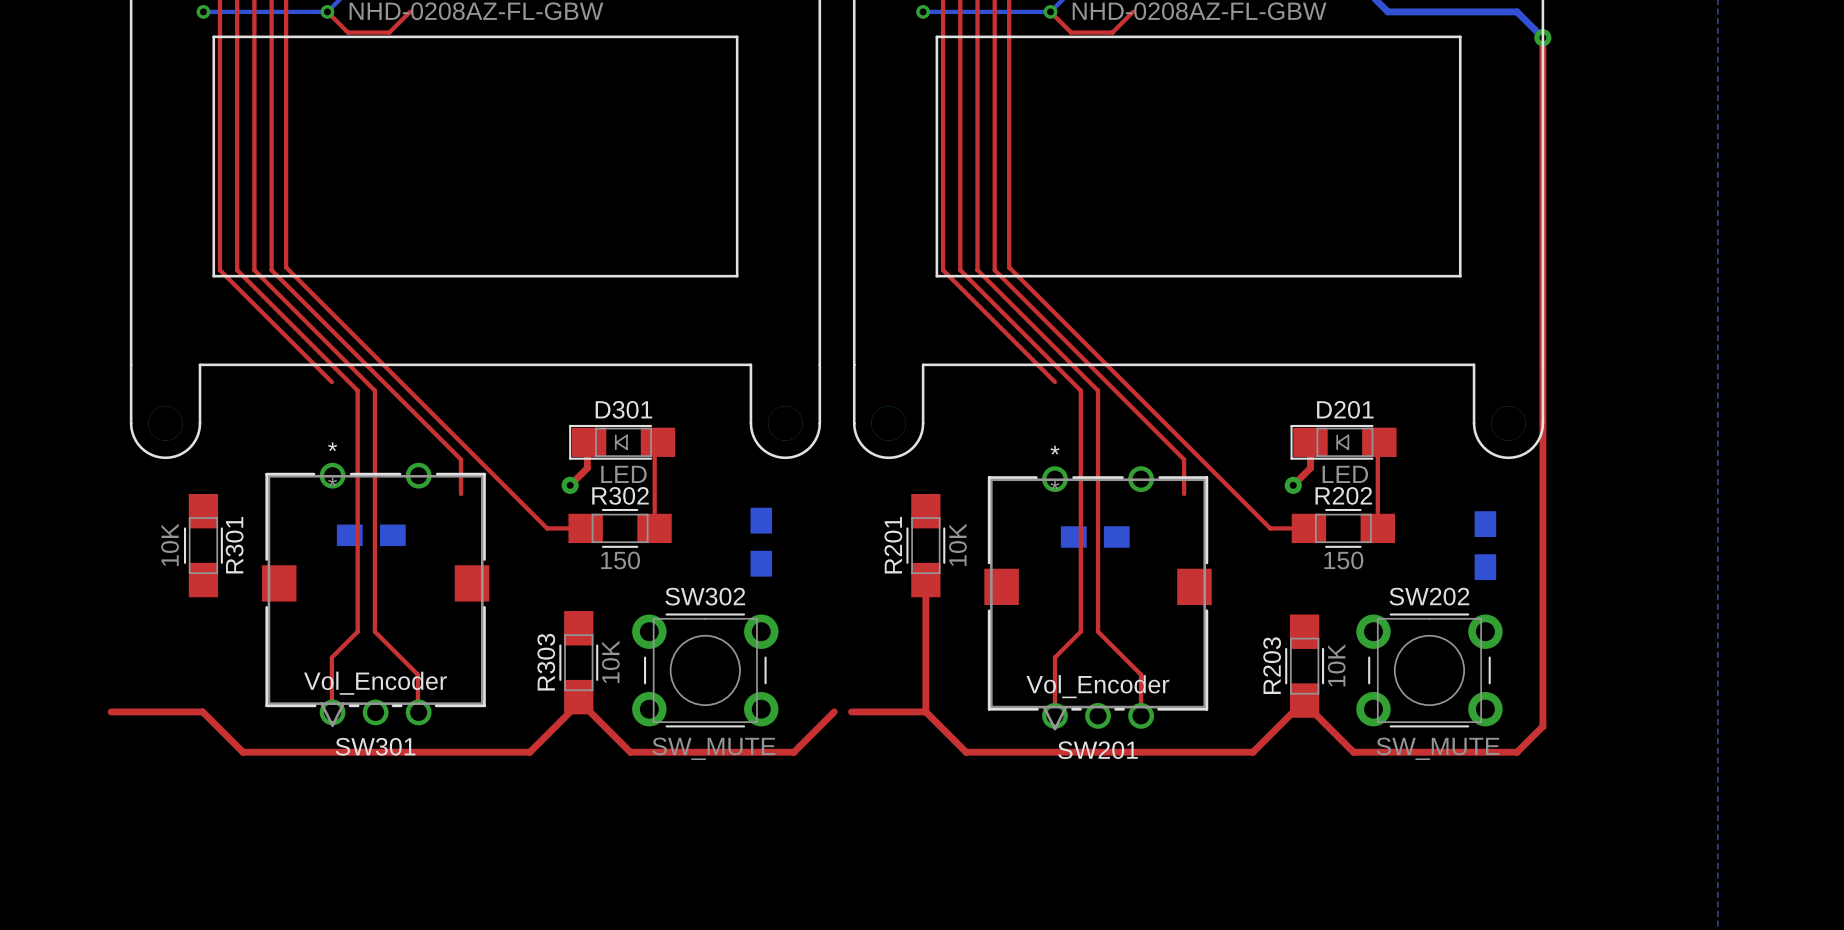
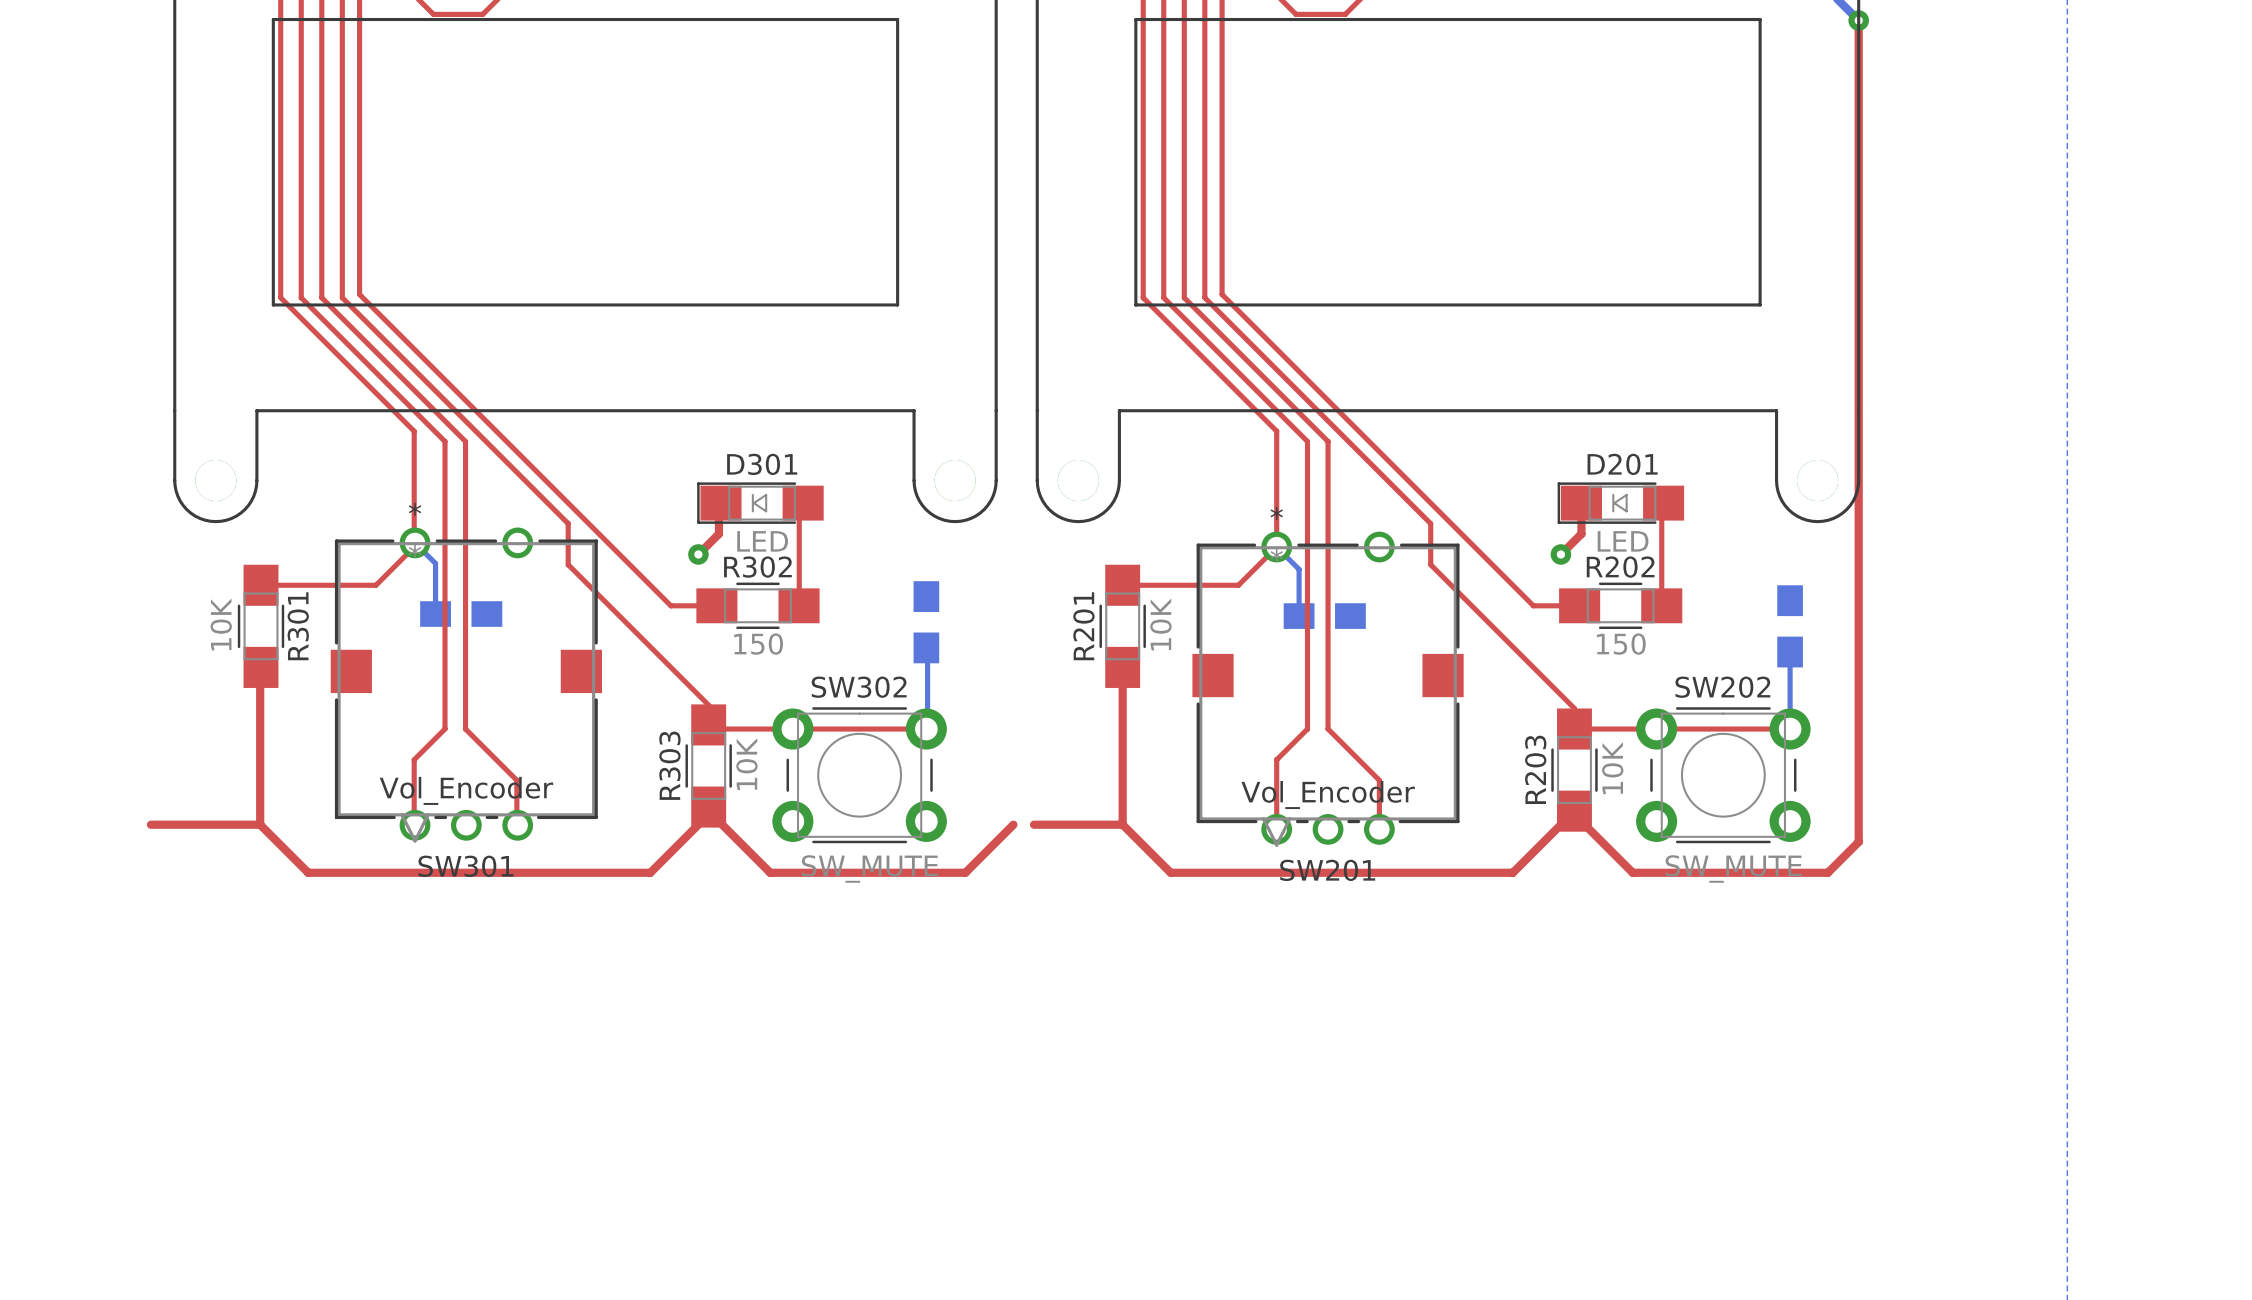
top track: none -> (414, 431) (414, 547) (375, 585) (260, 585)
top track: none -> (1276, 431) (1276, 547) (1238, 585) (1122, 585)
bottom track: none -> (415, 542) (435, 563) (435, 614)
bottom track: none -> (1276, 547) (1299, 569) (1299, 616)
top track: none -> (568, 564) (711, 708) (711, 729) (927, 729)
top track: none -> (1430, 564) (1574, 708) (1574, 729) (1790, 729)
bottom track: none -> (927, 652) (927, 729)
bottom track: none -> (1790, 652) (1790, 729)
top track: none -> (260, 667) (260, 824)

